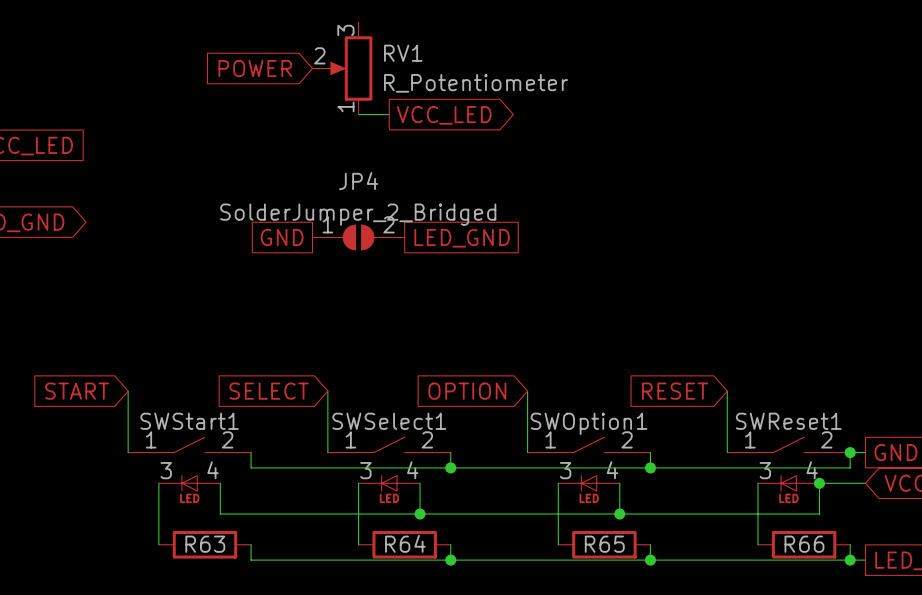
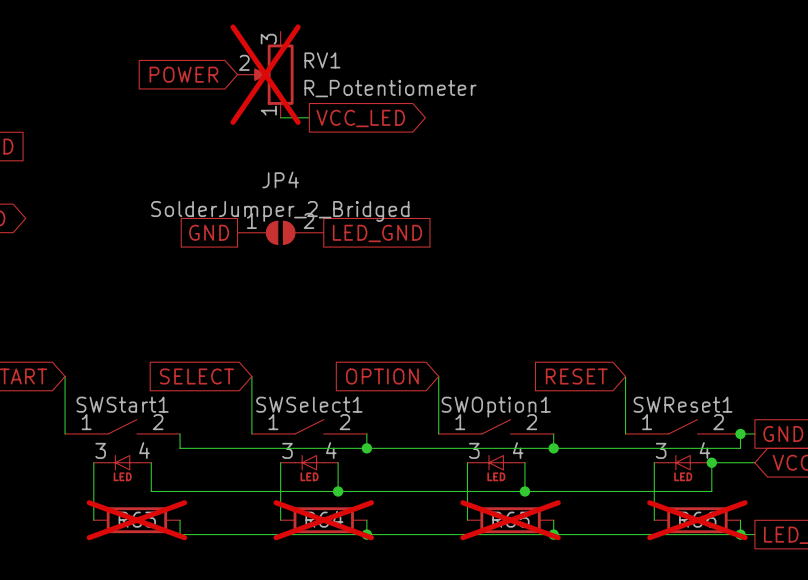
RV1 do-not-place cross: none -> (265, 74)
R63 do-not-place cross: none -> (136, 520)
R64 do-not-place cross: none -> (323, 520)
R65 do-not-place cross: none -> (510, 520)
R66 do-not-place cross: none -> (697, 520)

